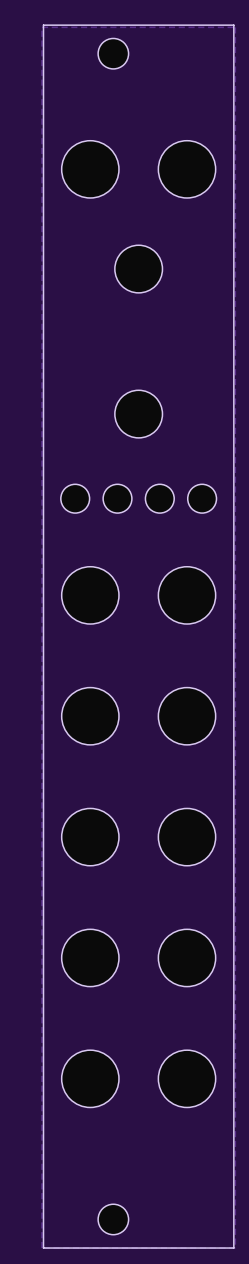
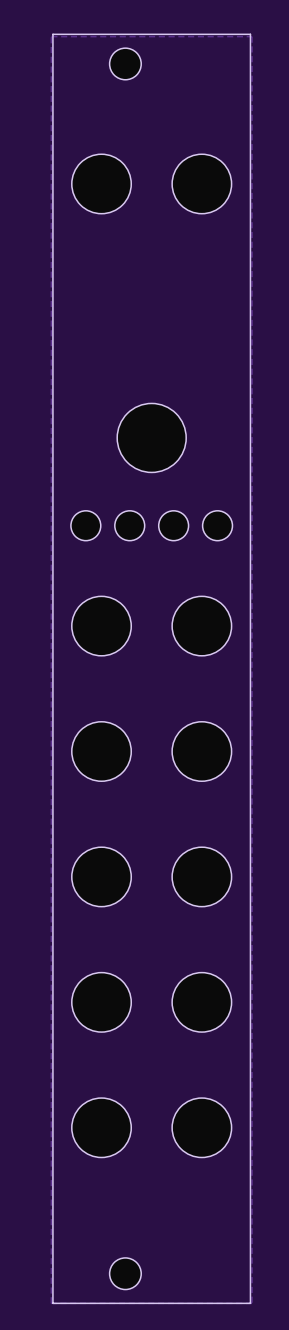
hole: (138, 269) -> none
hole size: [114, 390, 163, 438] -> [117, 403, 187, 473]

